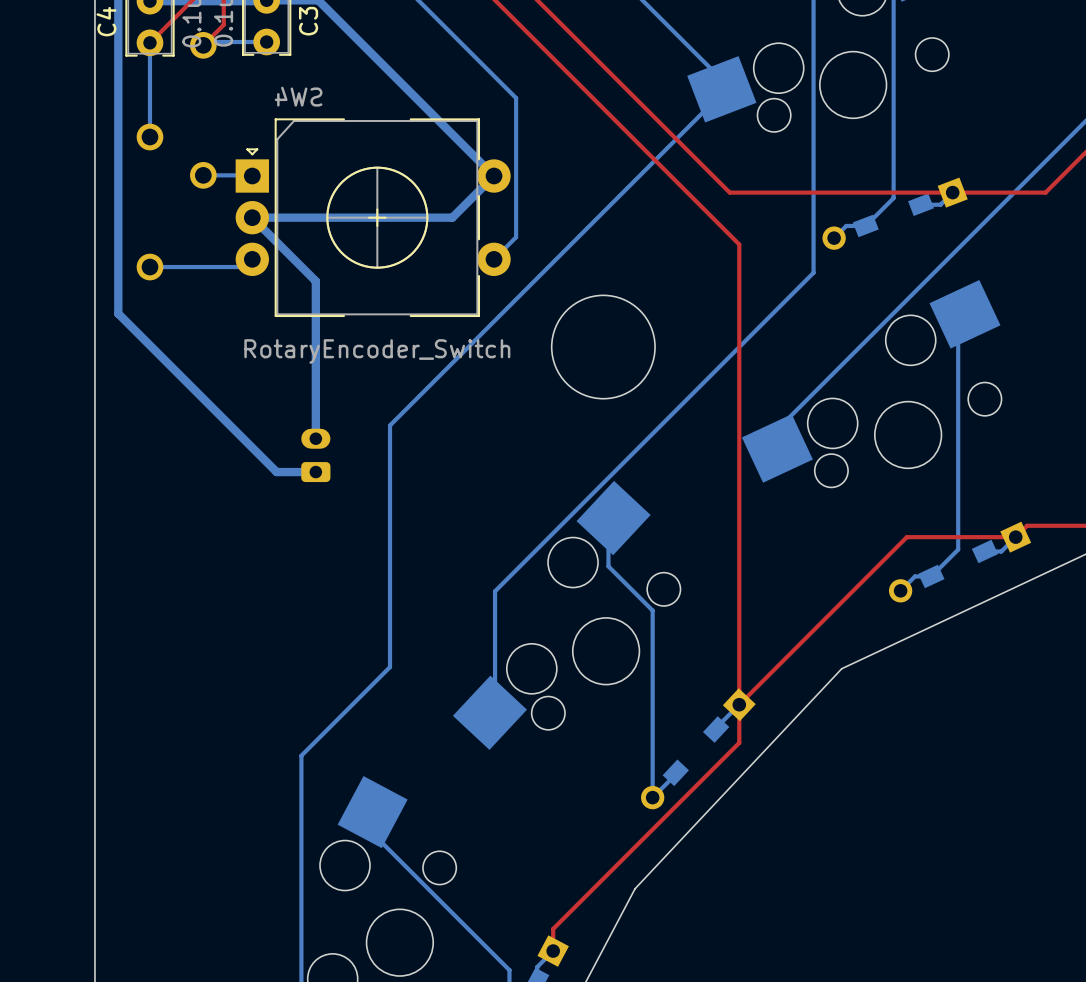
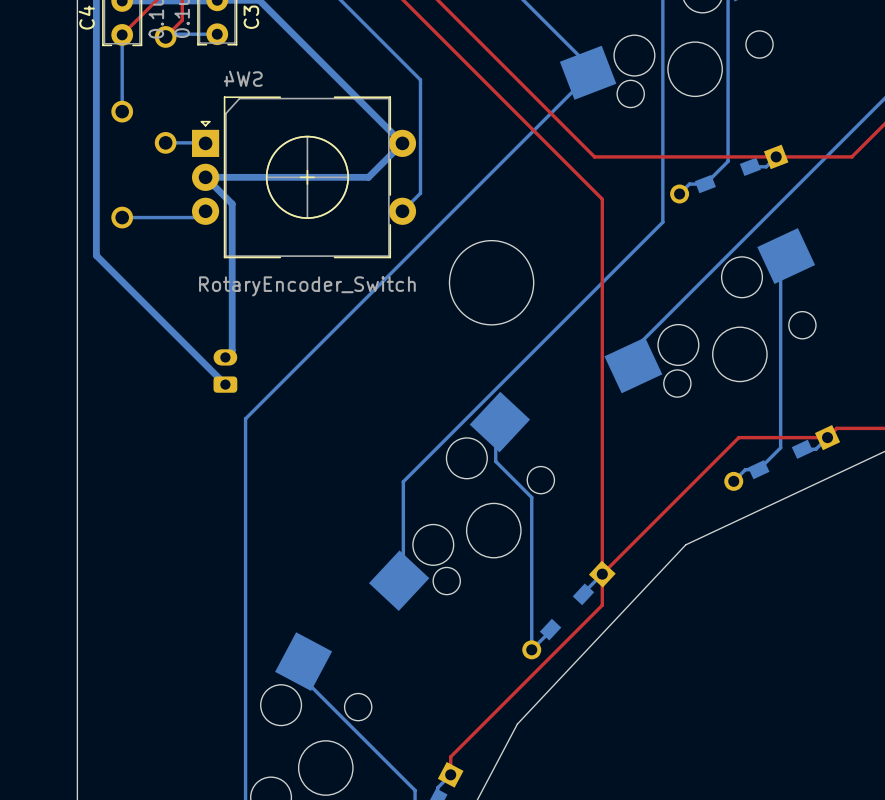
bottom track: (285, 250) (315, 281) (315, 438) -> (232, 203) (232, 350) (225, 357)
bottom track: (390, 425) (390, 667) (301, 755) -> (317, 346) (245, 418) (245, 615)
part position: (315, 455) -> (225, 371)
bottom track: (276, 472) (315, 472) -> none

